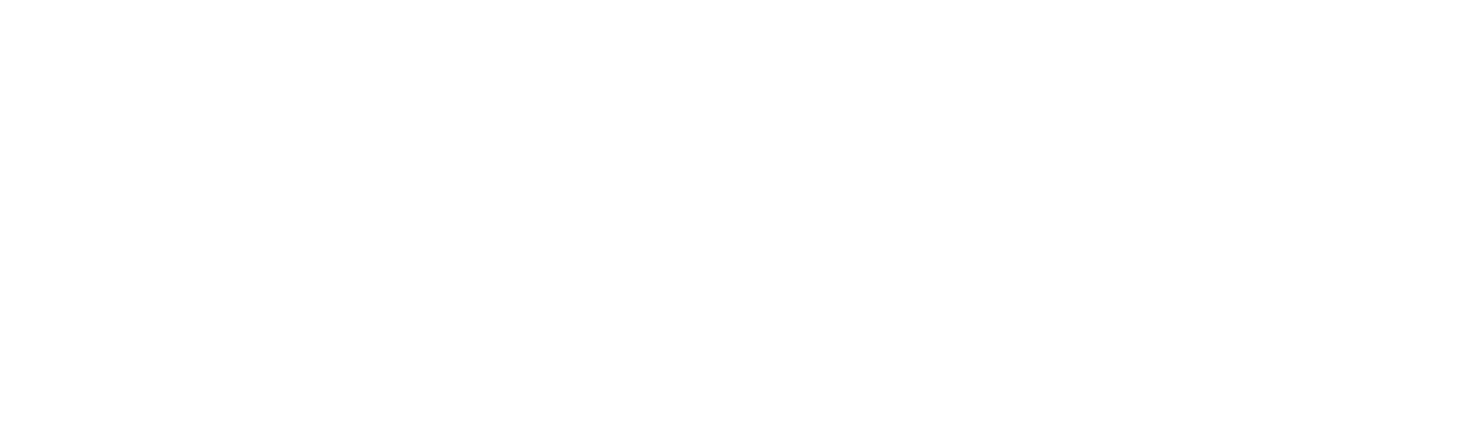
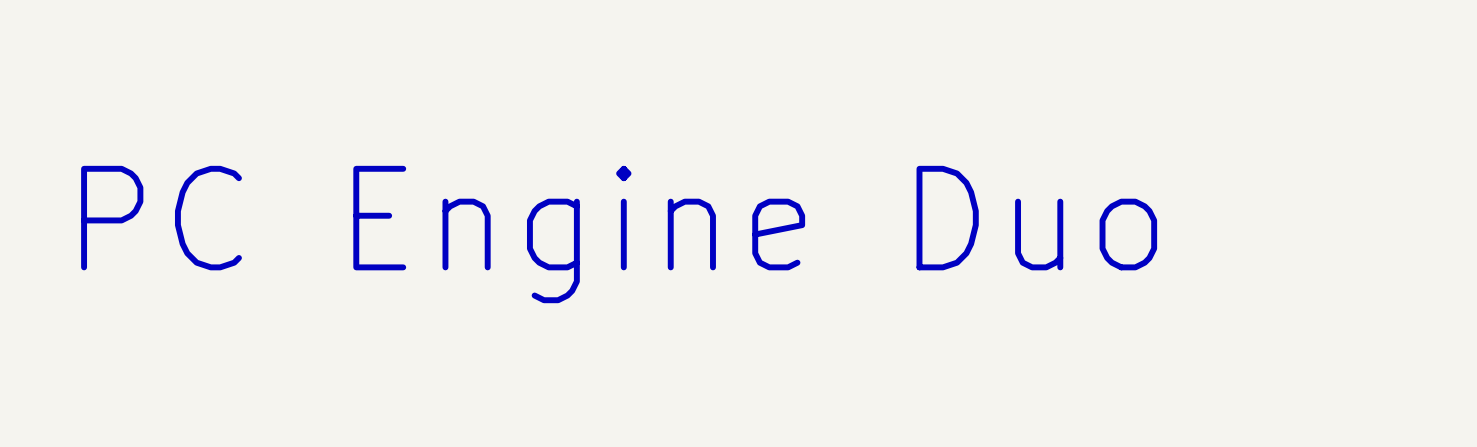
text: none -> PC Engine Duo (619, 234)

